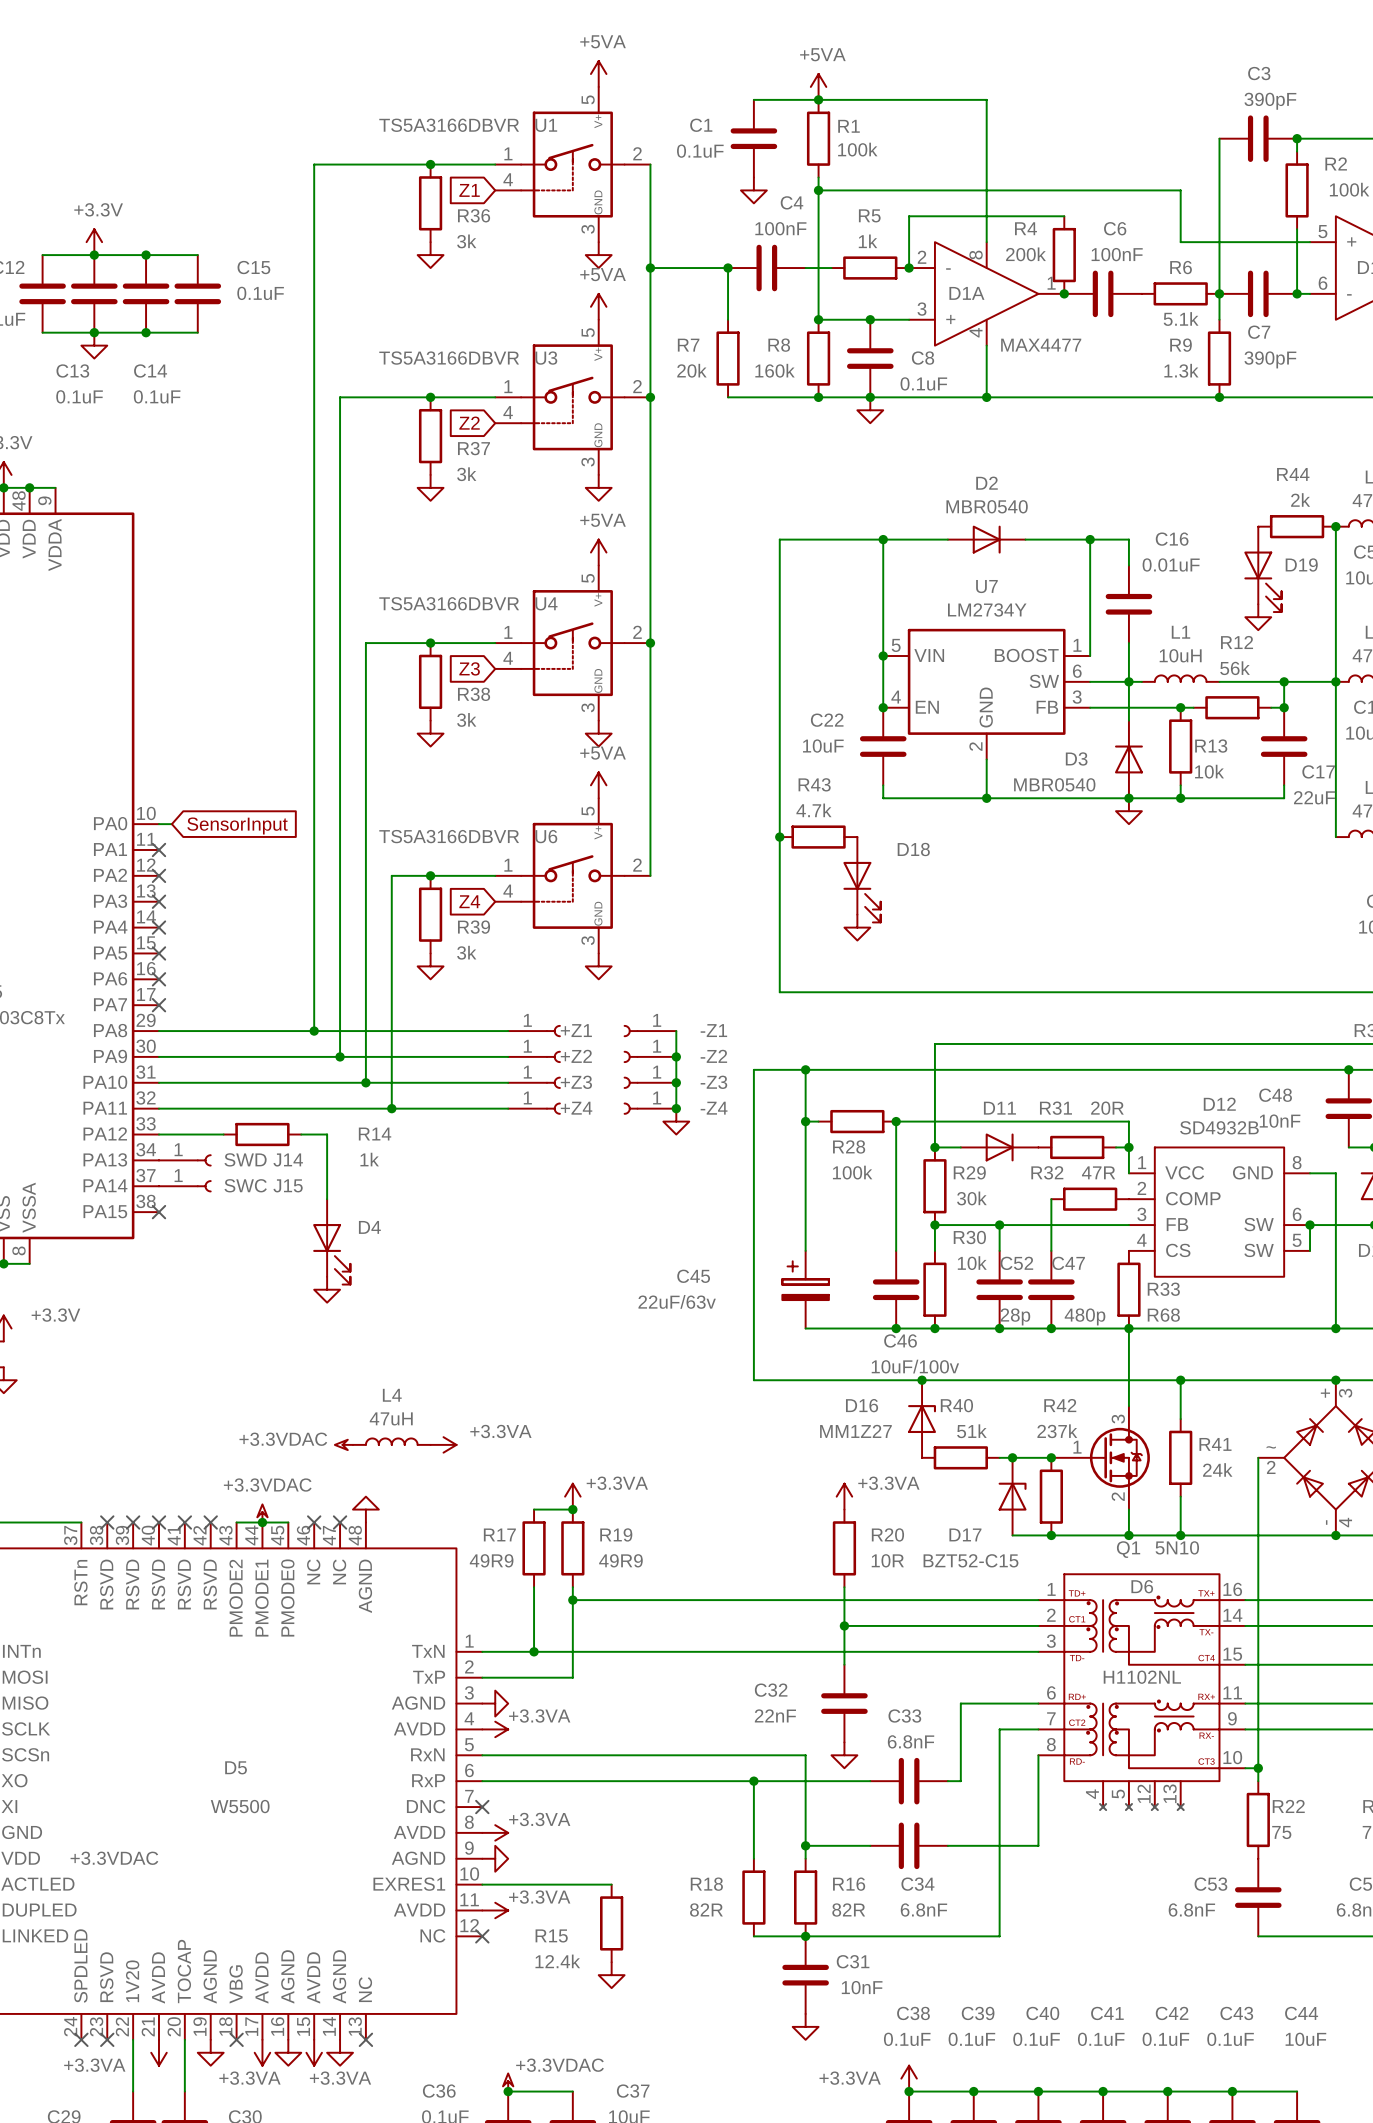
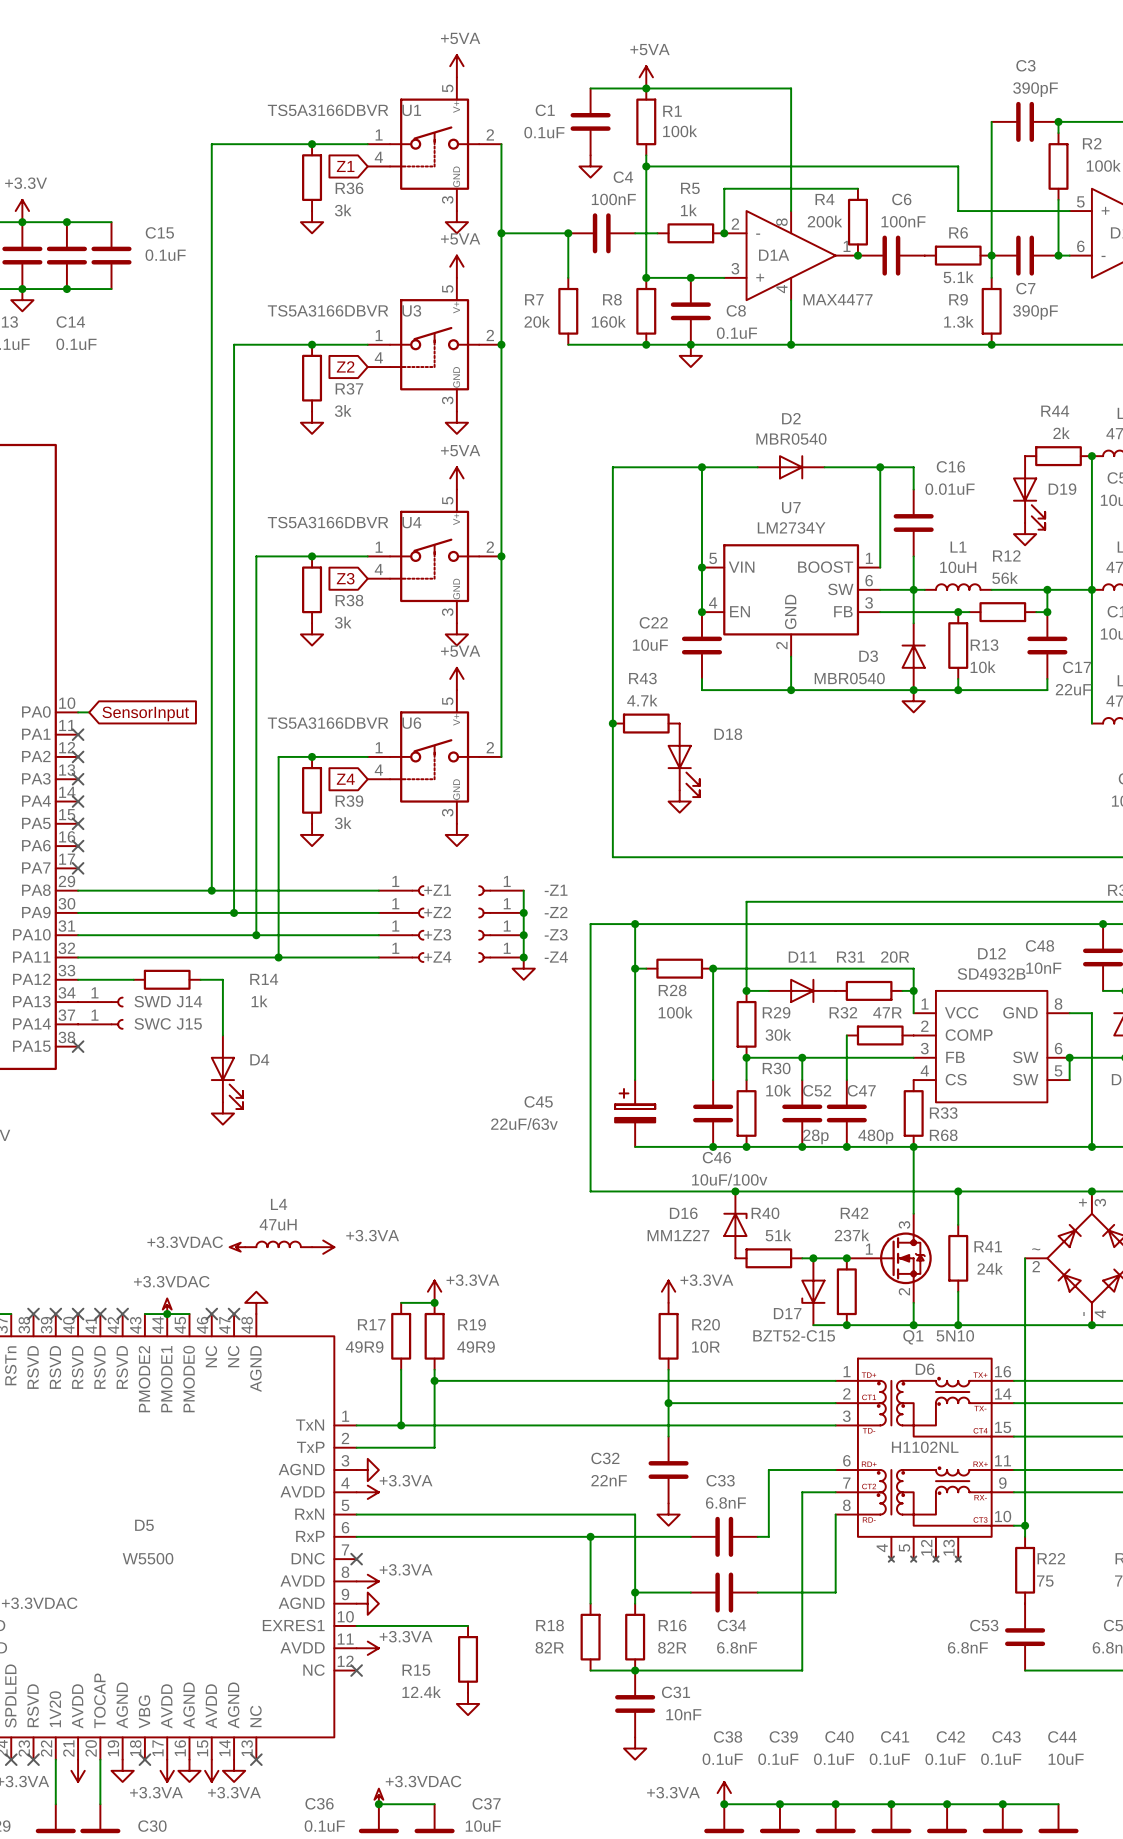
D17 rotation: 0° (1012, 1496) -> 180° (813, 1291)

